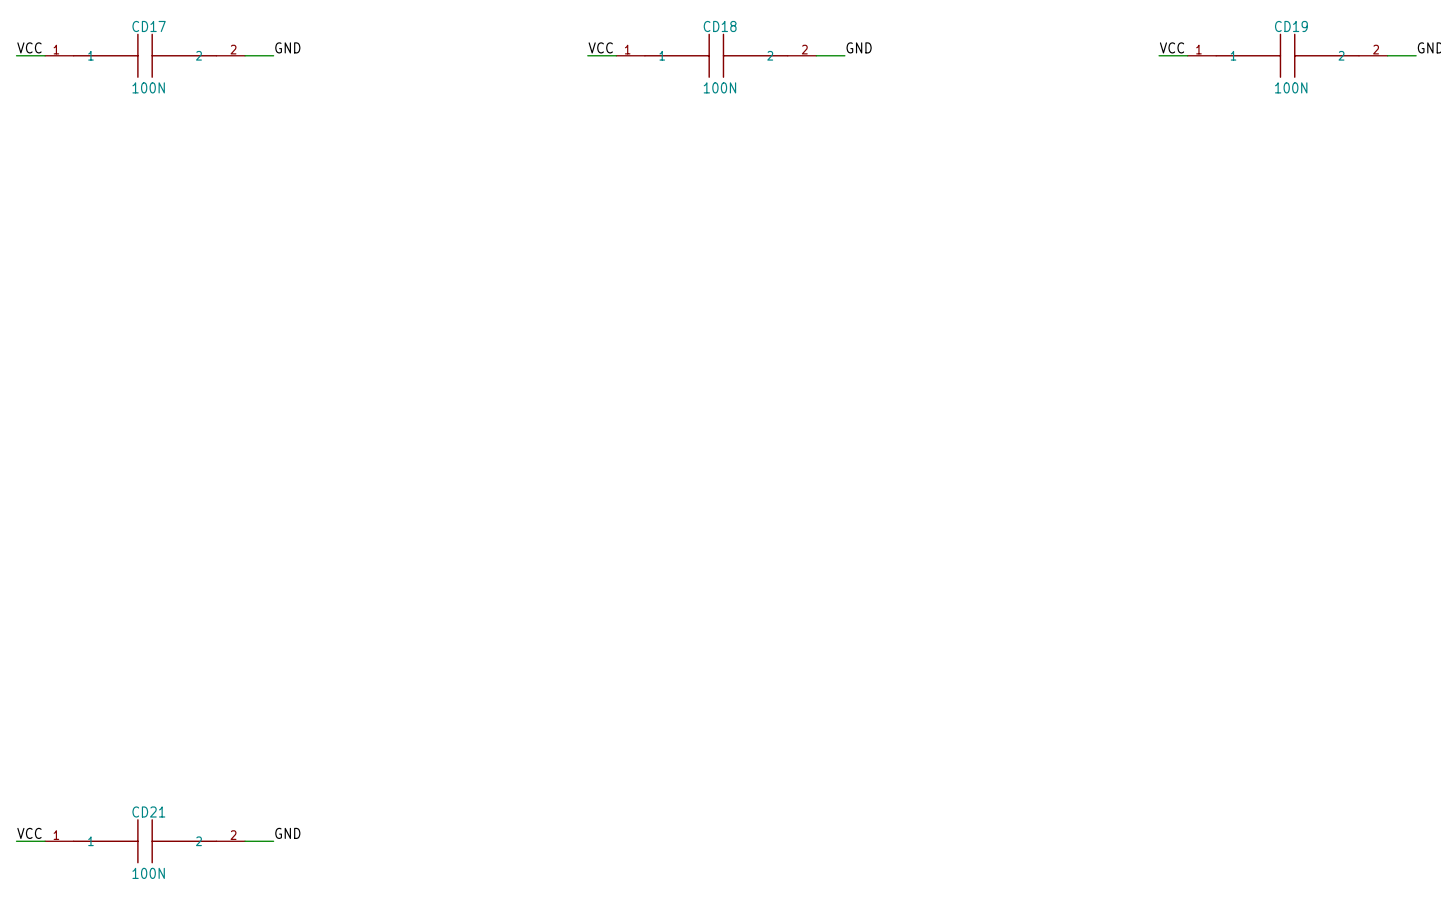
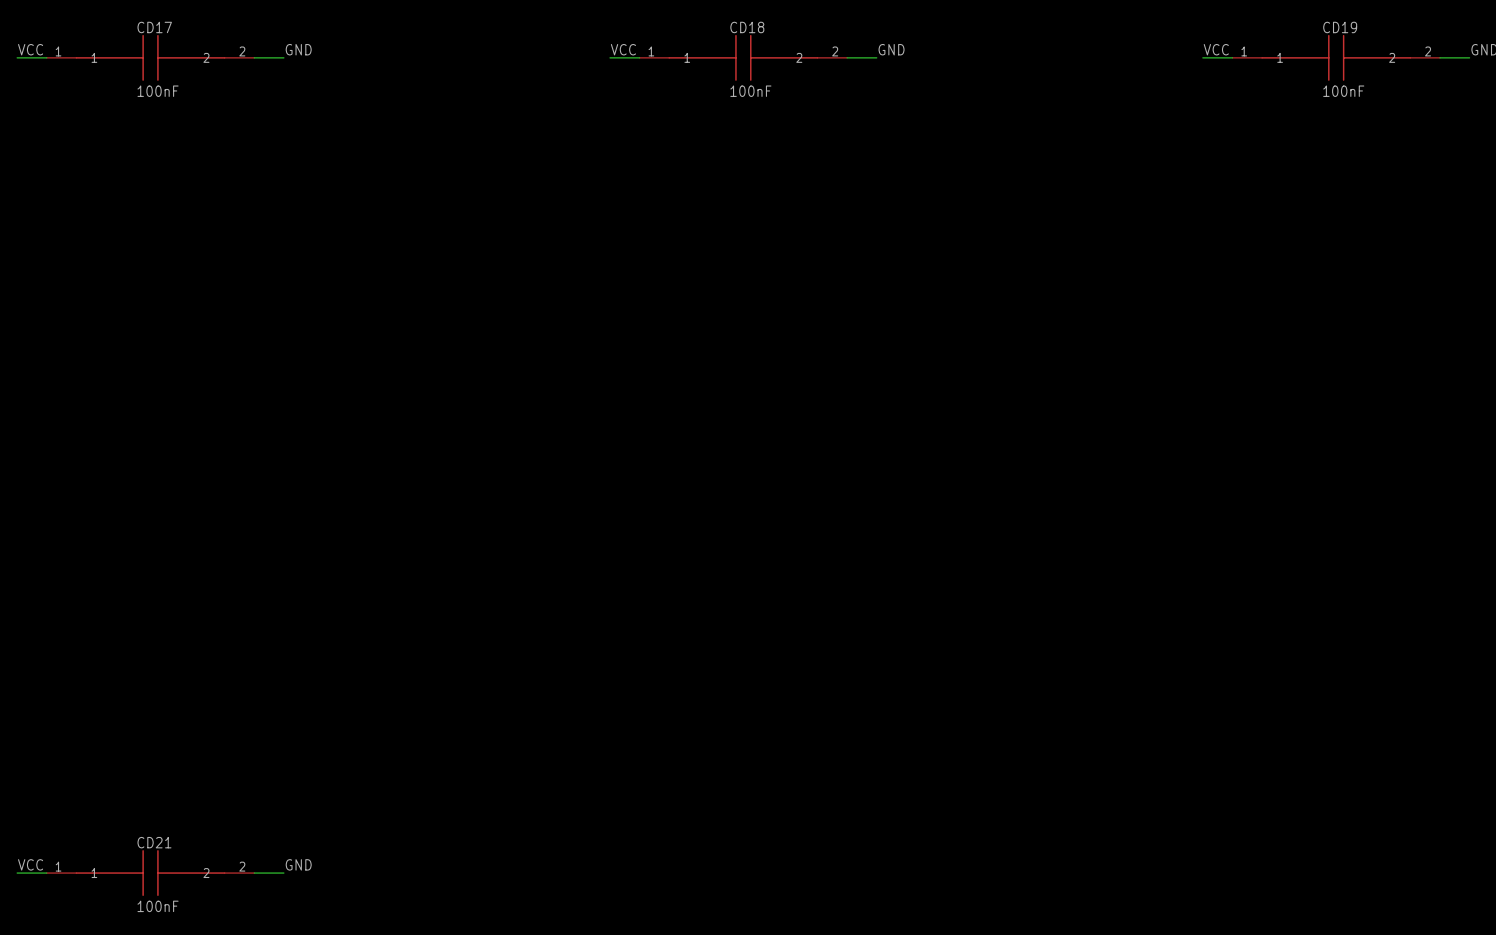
CD17 value: 100N (148, 87) -> 100nF (158, 91)
CD18 value: 100N (719, 87) -> 100nF (750, 91)
CD19 value: 100N (1291, 87) -> 100nF (1343, 91)
CD21 value: 100N (148, 873) -> 100nF (158, 906)

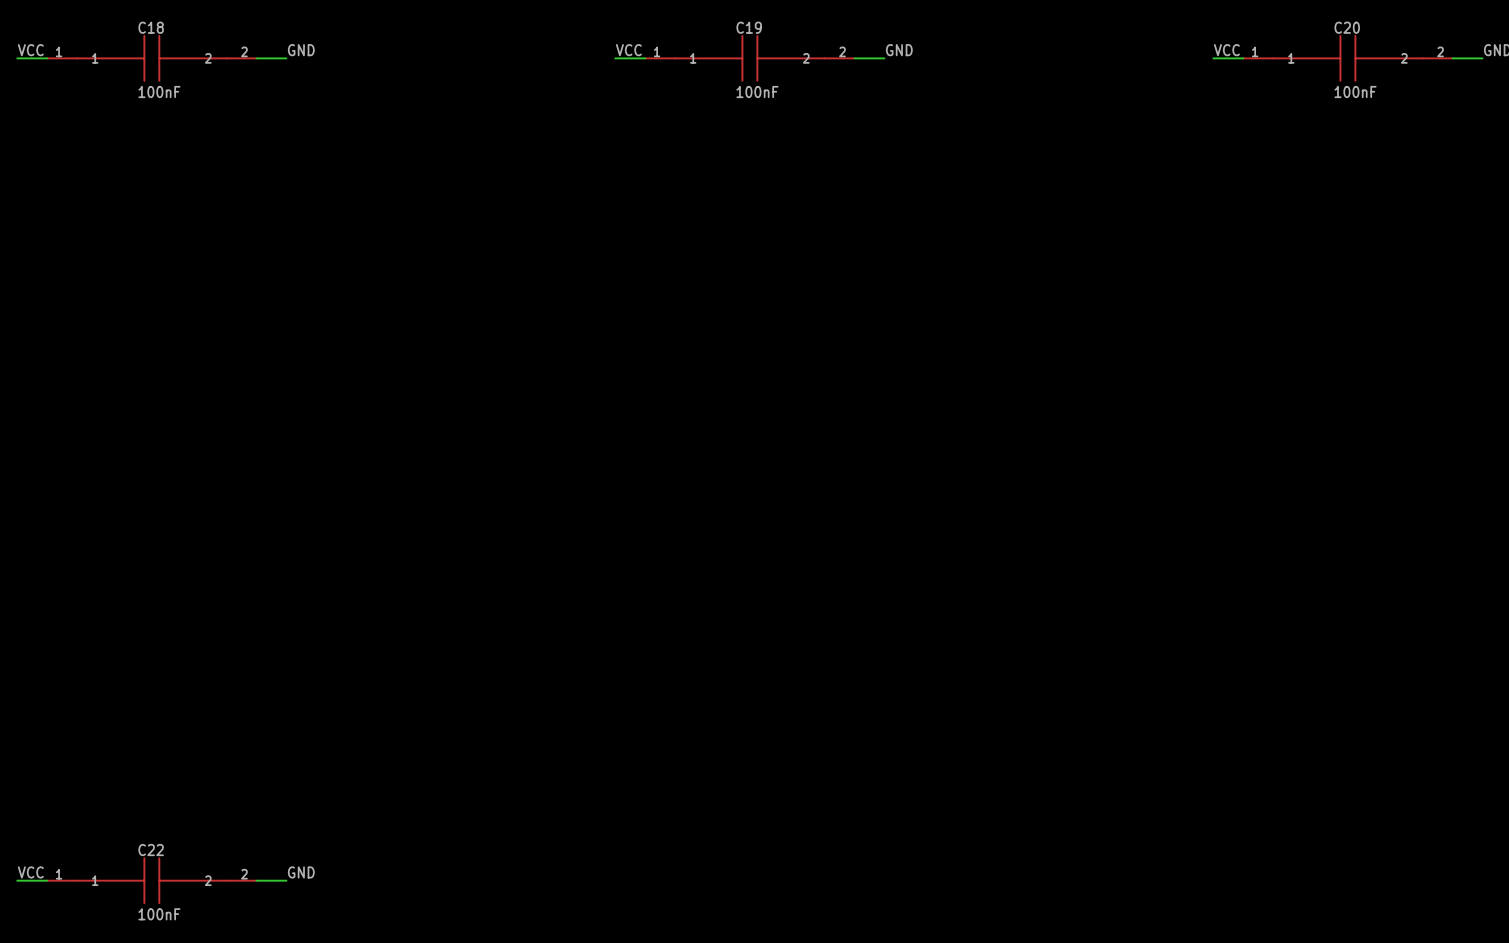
CD17 name: CD17 (154, 27) -> C18 (151, 27)
CD18 name: CD18 (747, 27) -> C19 (749, 27)
CD19 name: CD19 (1340, 27) -> C20 (1347, 27)
CD21 name: CD21 (154, 842) -> C22 (151, 850)

